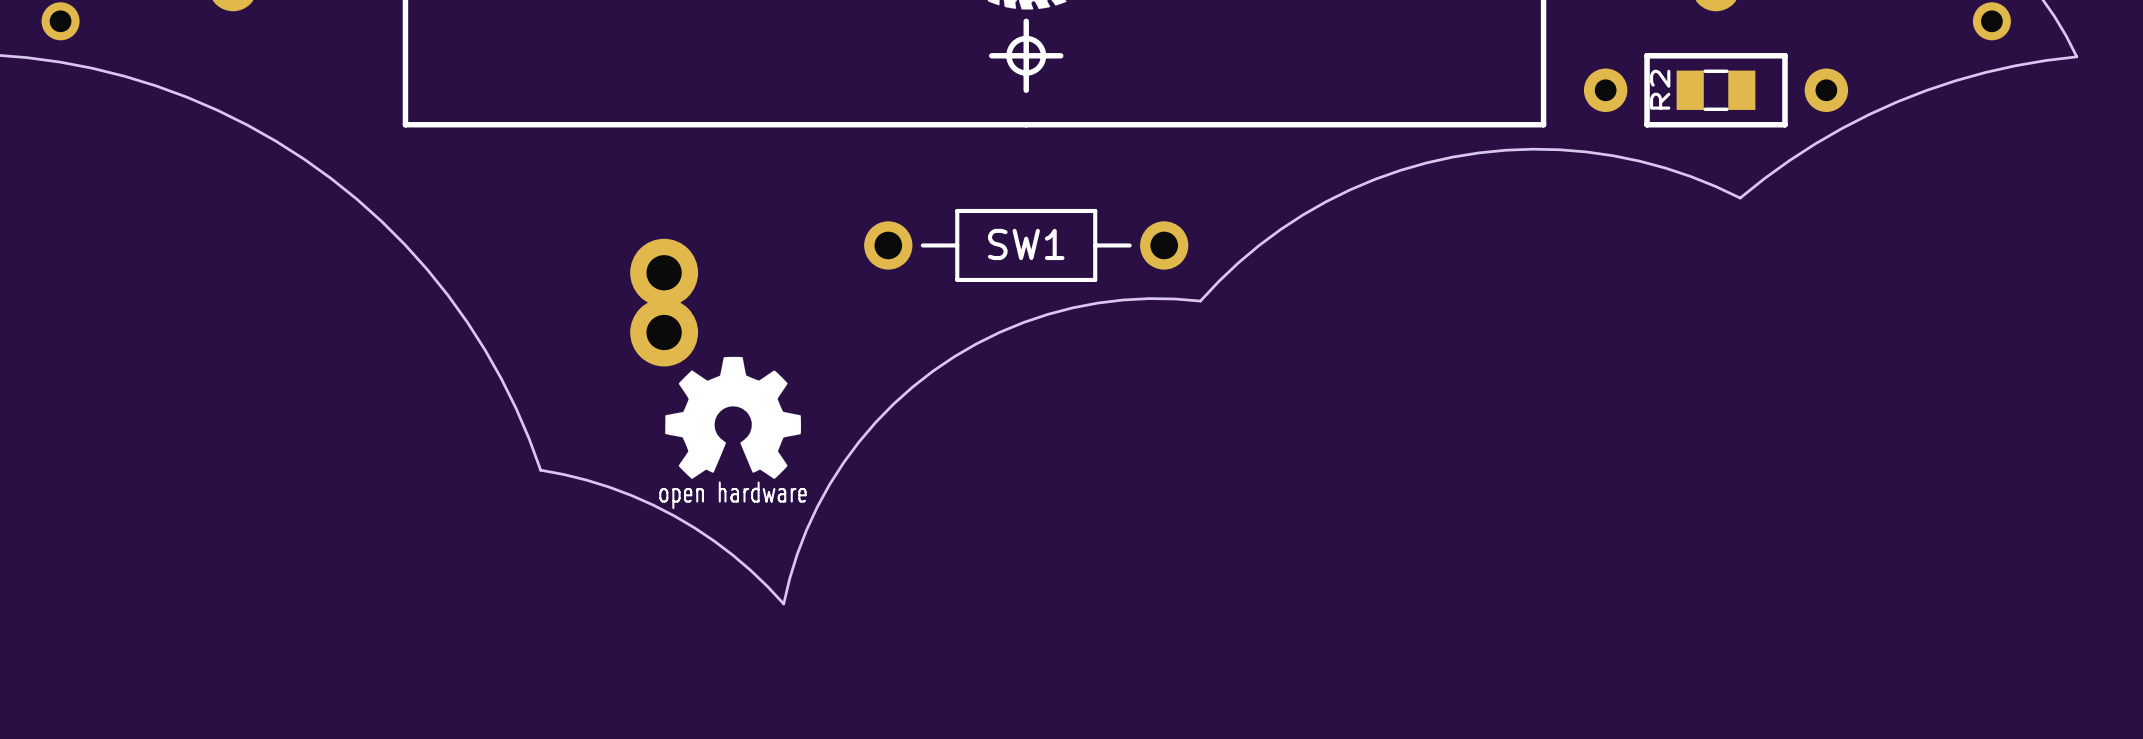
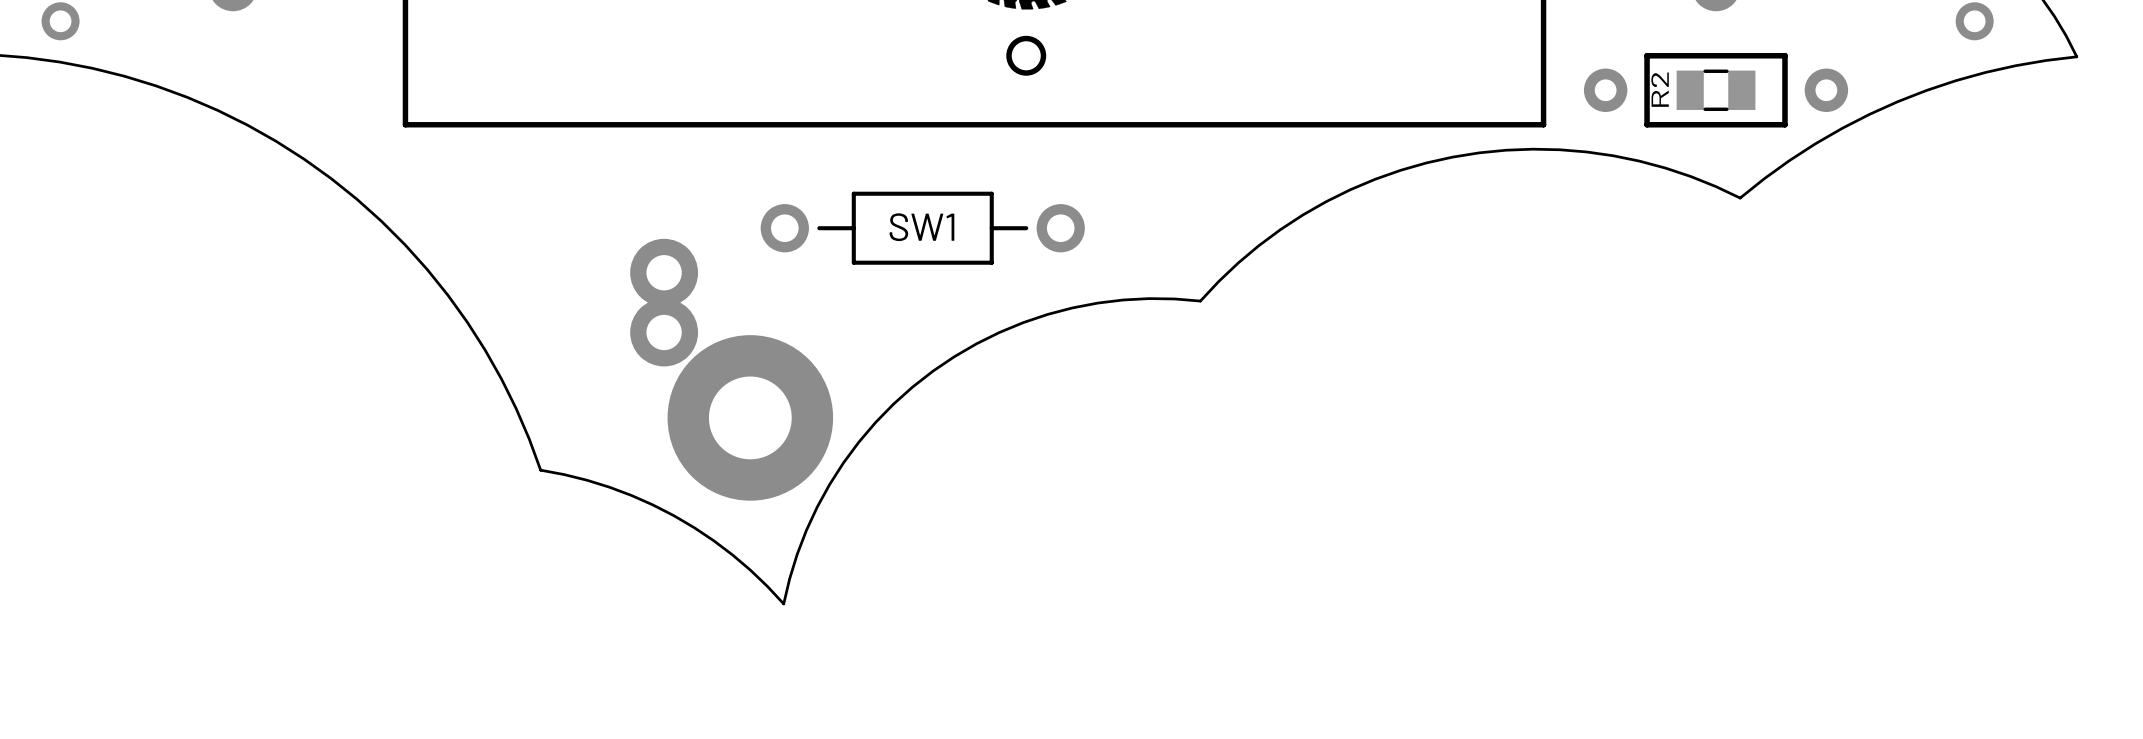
line: (1026, 21) (1026, 90) -> none
part position: (1991, 21) -> (1974, 21)
line: (991, 55) (1060, 55) -> none
SW1 position: (1026, 245) -> (922, 228)
drawing: [659, 356, 807, 510] -> none
part: none -> (750, 417)

